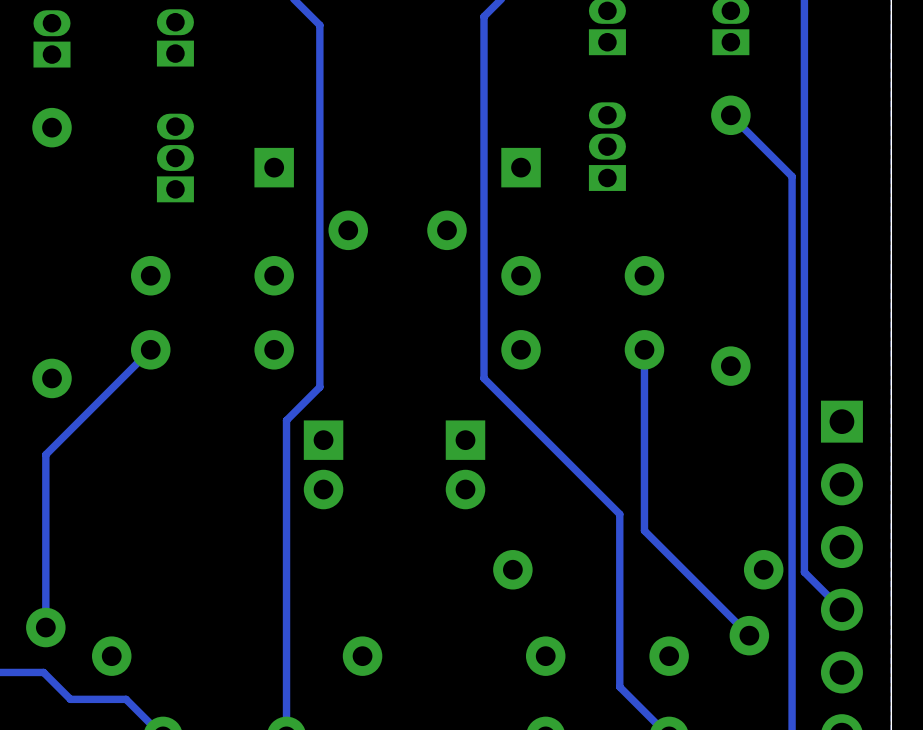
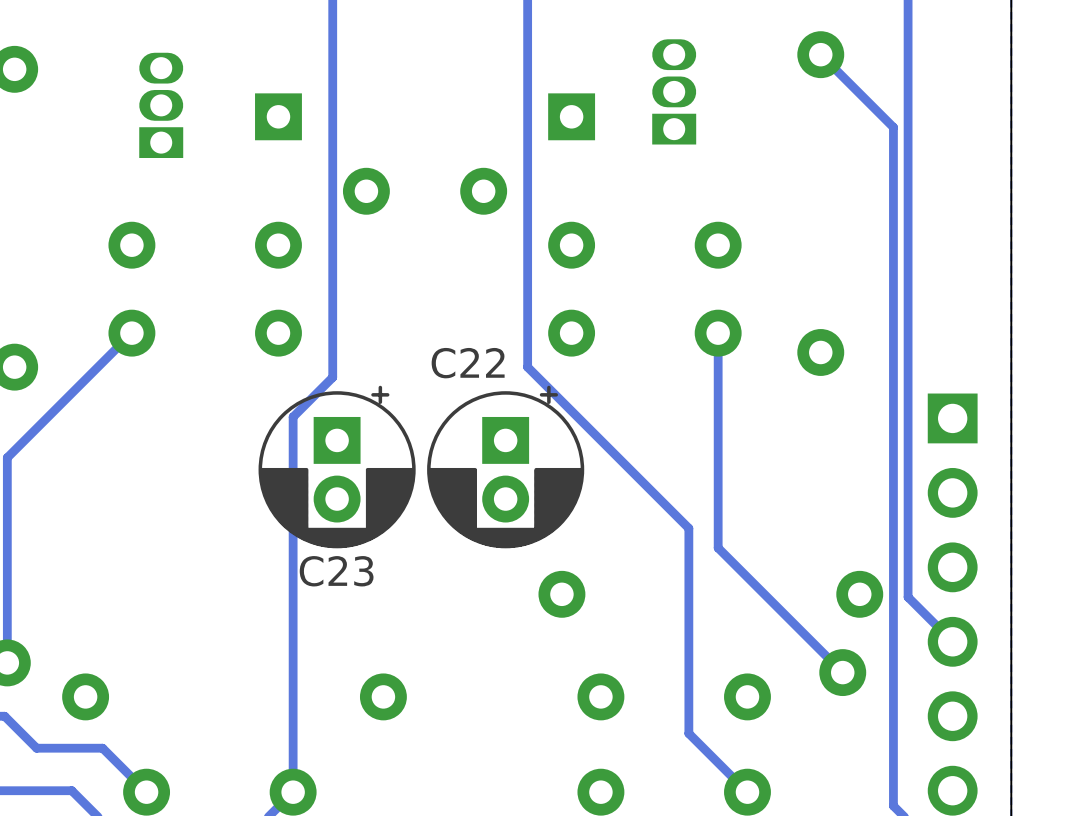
C23 side: top (323, 464) -> bottom (337, 467)
C22 side: top (465, 464) -> bottom (505, 467)

